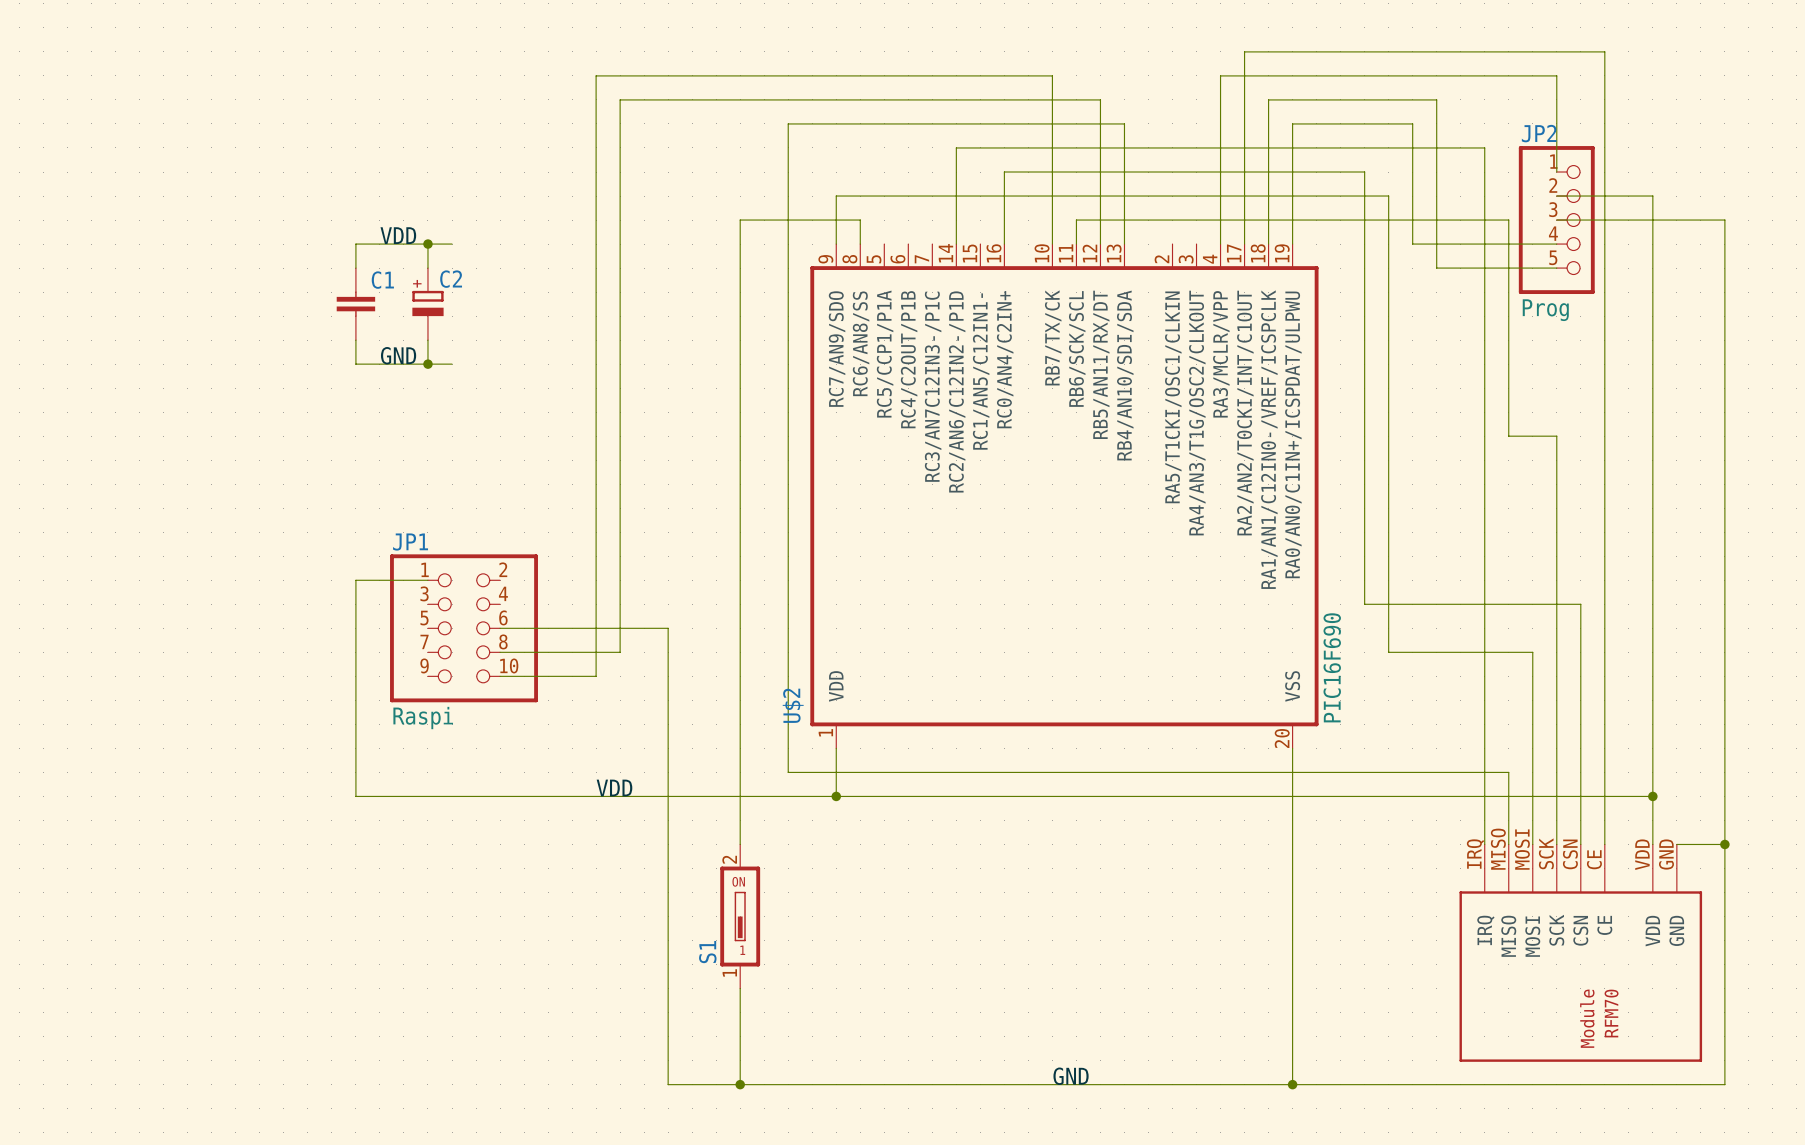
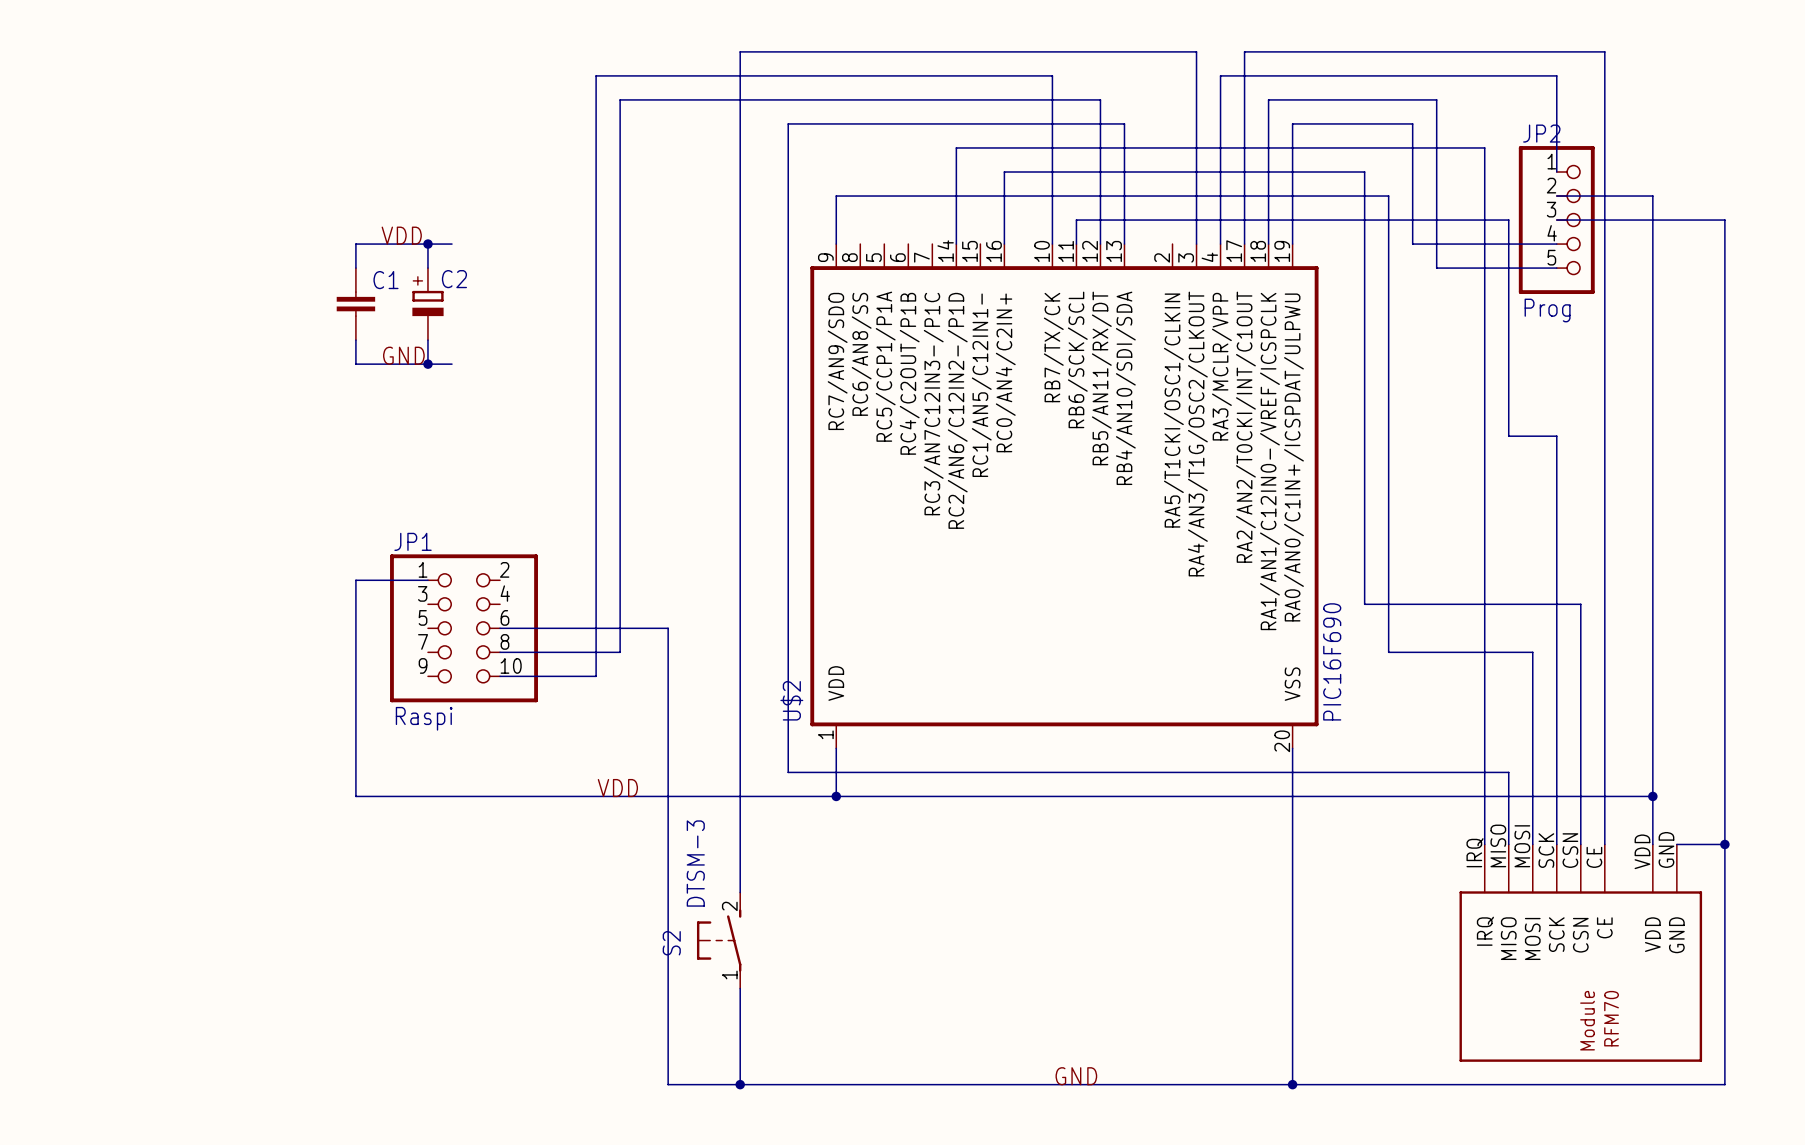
wire: (740, 220) (860, 220) (860, 244) -> (740, 220) (740, 51) (1196, 51) (1196, 244)
S1: (740, 916) -> none
S2: none -> DTSM-3 (719, 940)

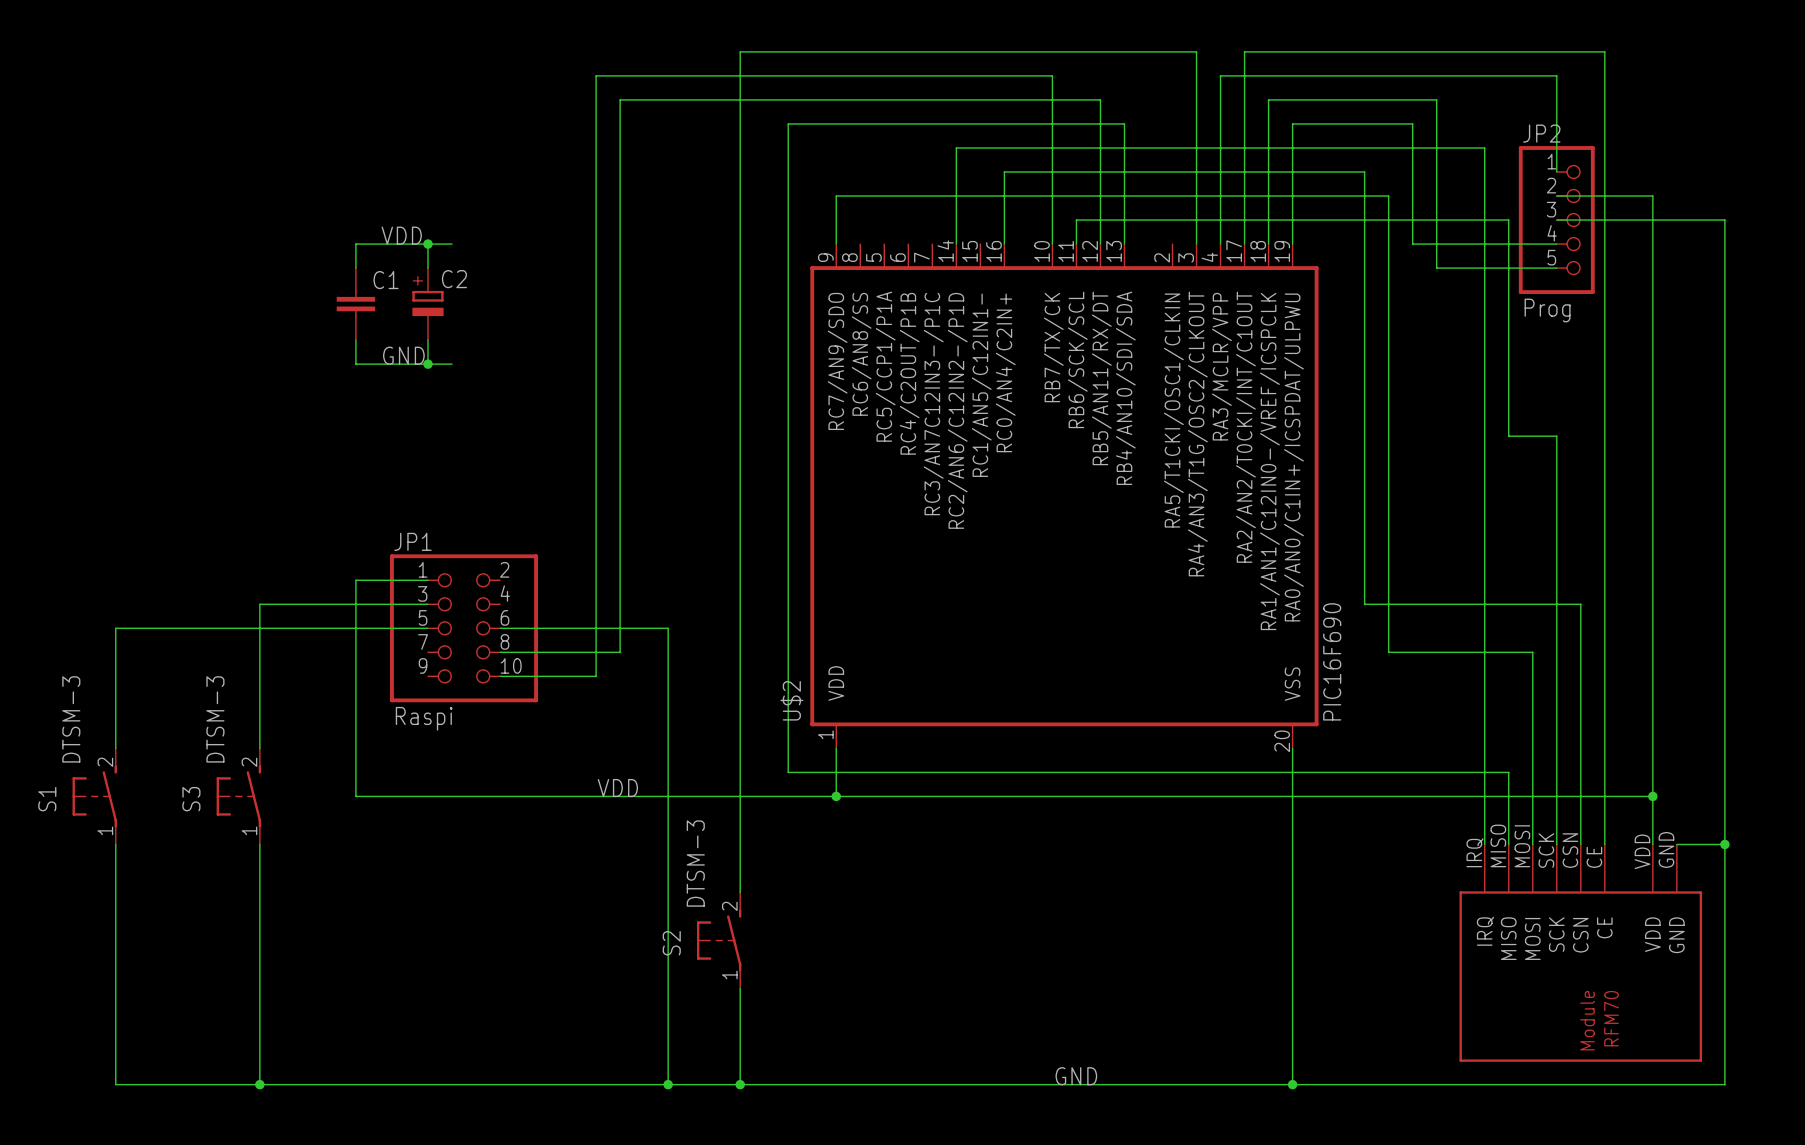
wire: none -> (427, 604) (259, 604) (259, 748)
wire: none -> (427, 628) (115, 628) (115, 748)
S1: none -> DTSM-3 (94, 796)
S3: none -> DTSM-3 (238, 796)
wire: none -> (115, 844) (115, 1084) (668, 1084)
wire: none -> (259, 844) (259, 1084)
junction: none -> (259, 1084)
junction: none -> (668, 1084)

